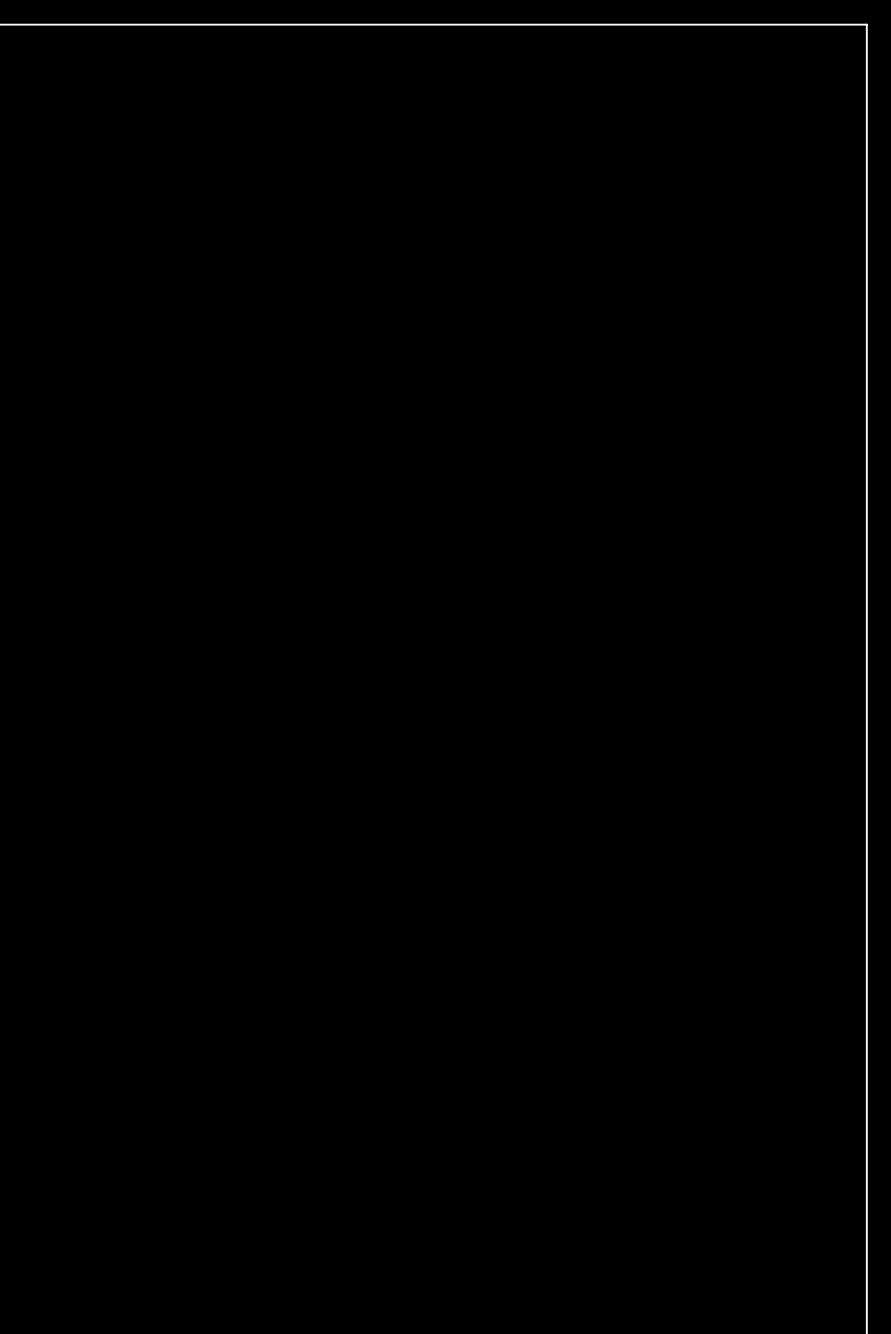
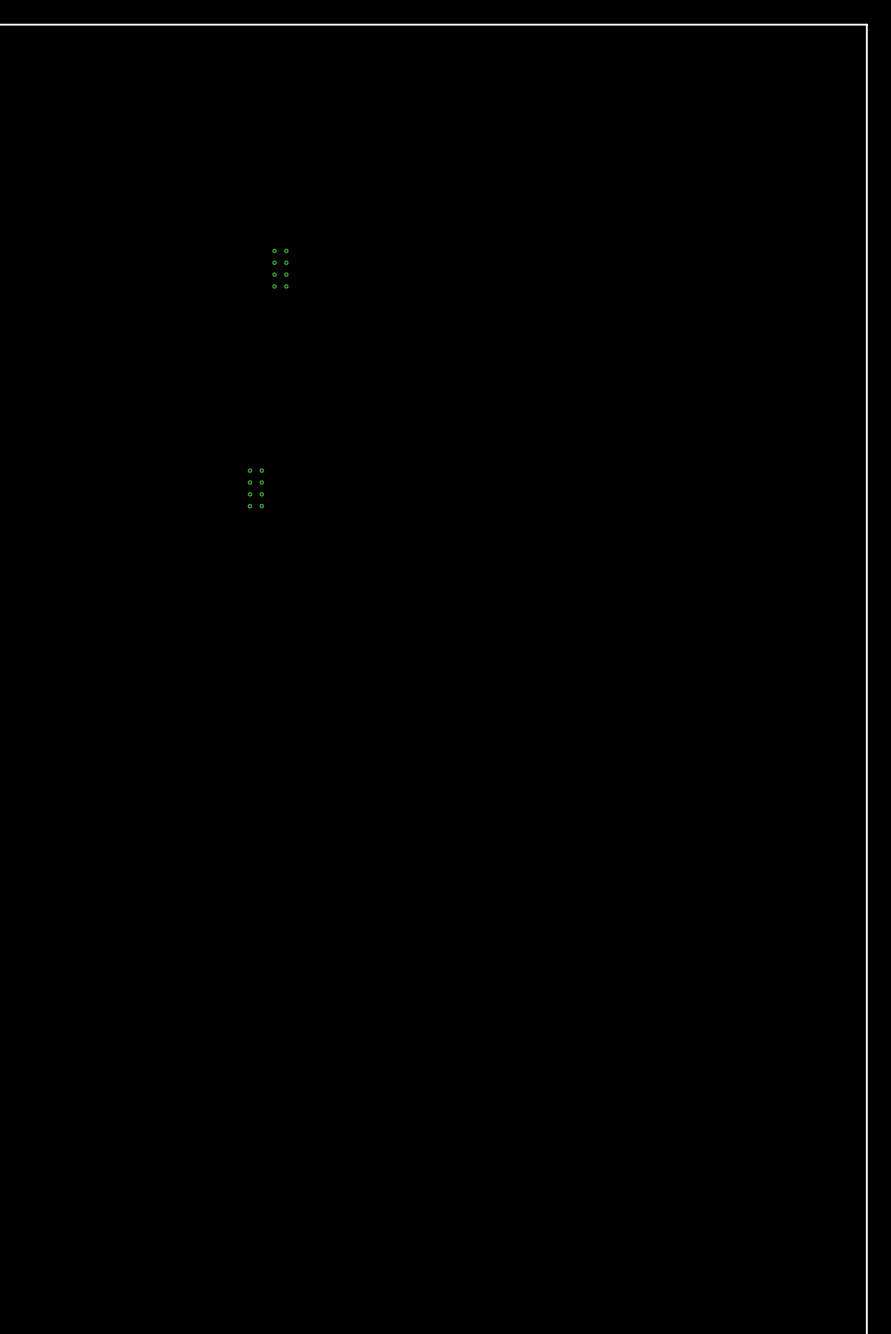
part: none -> (280, 268)
part: none -> (255, 488)

